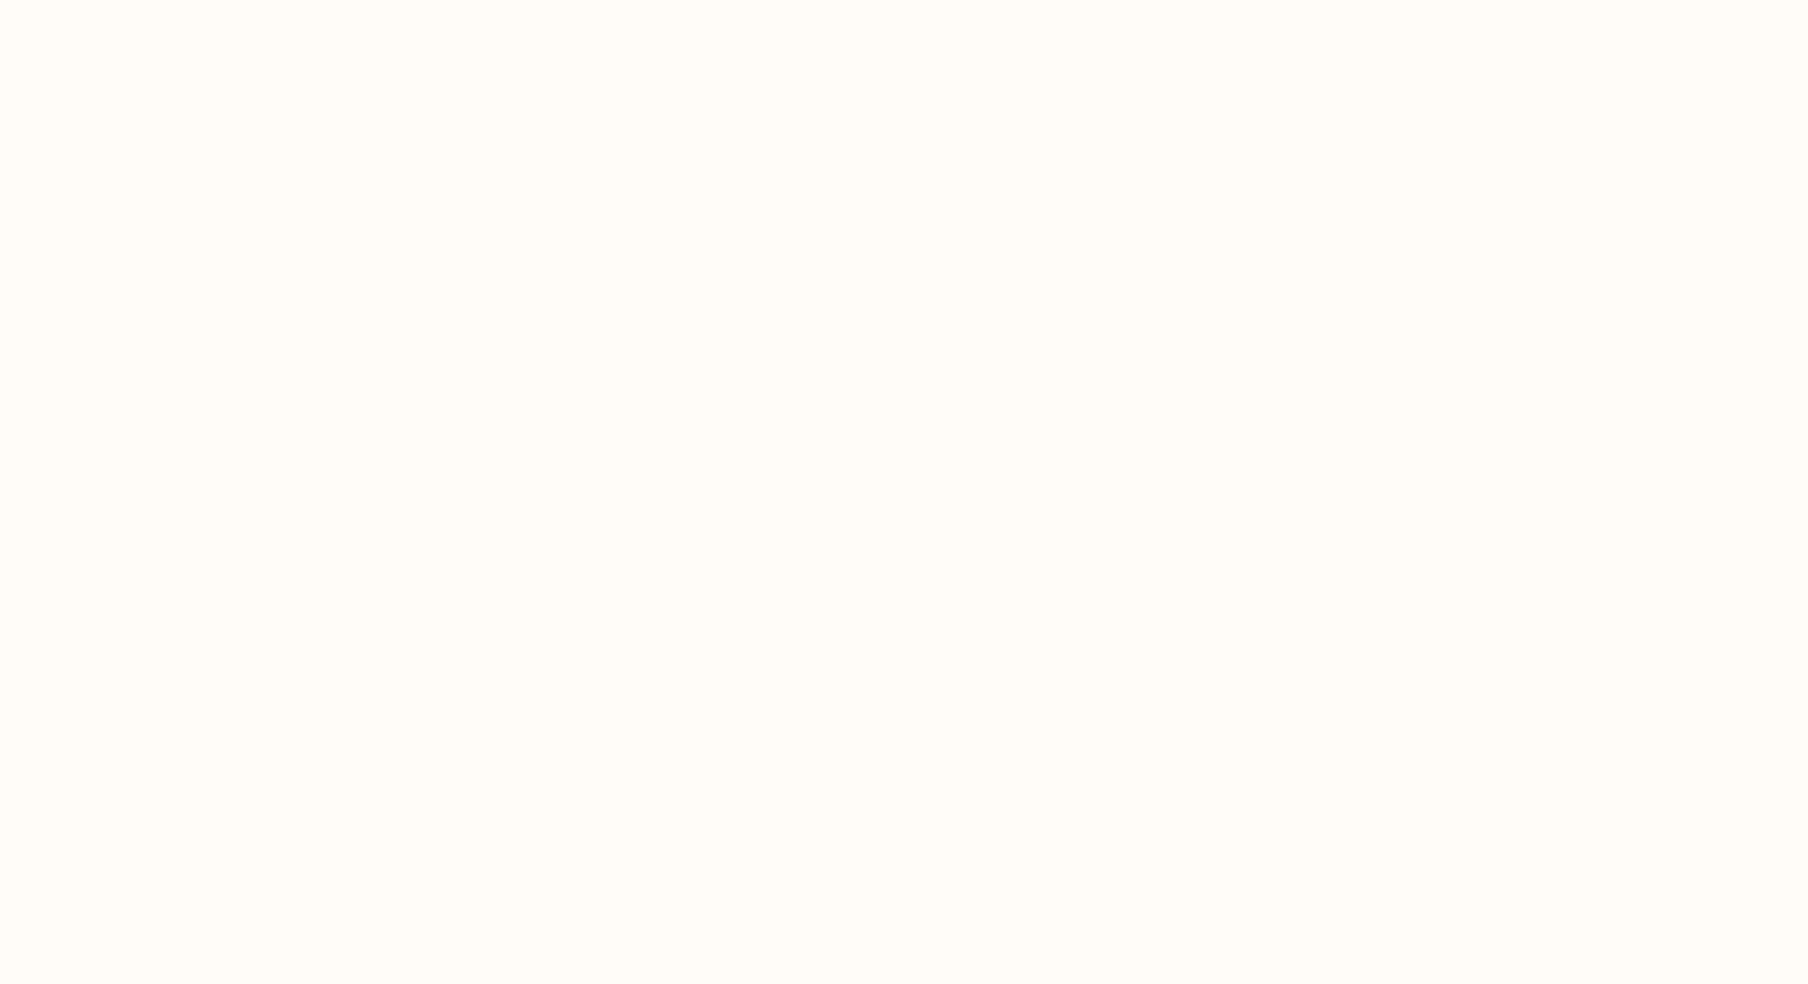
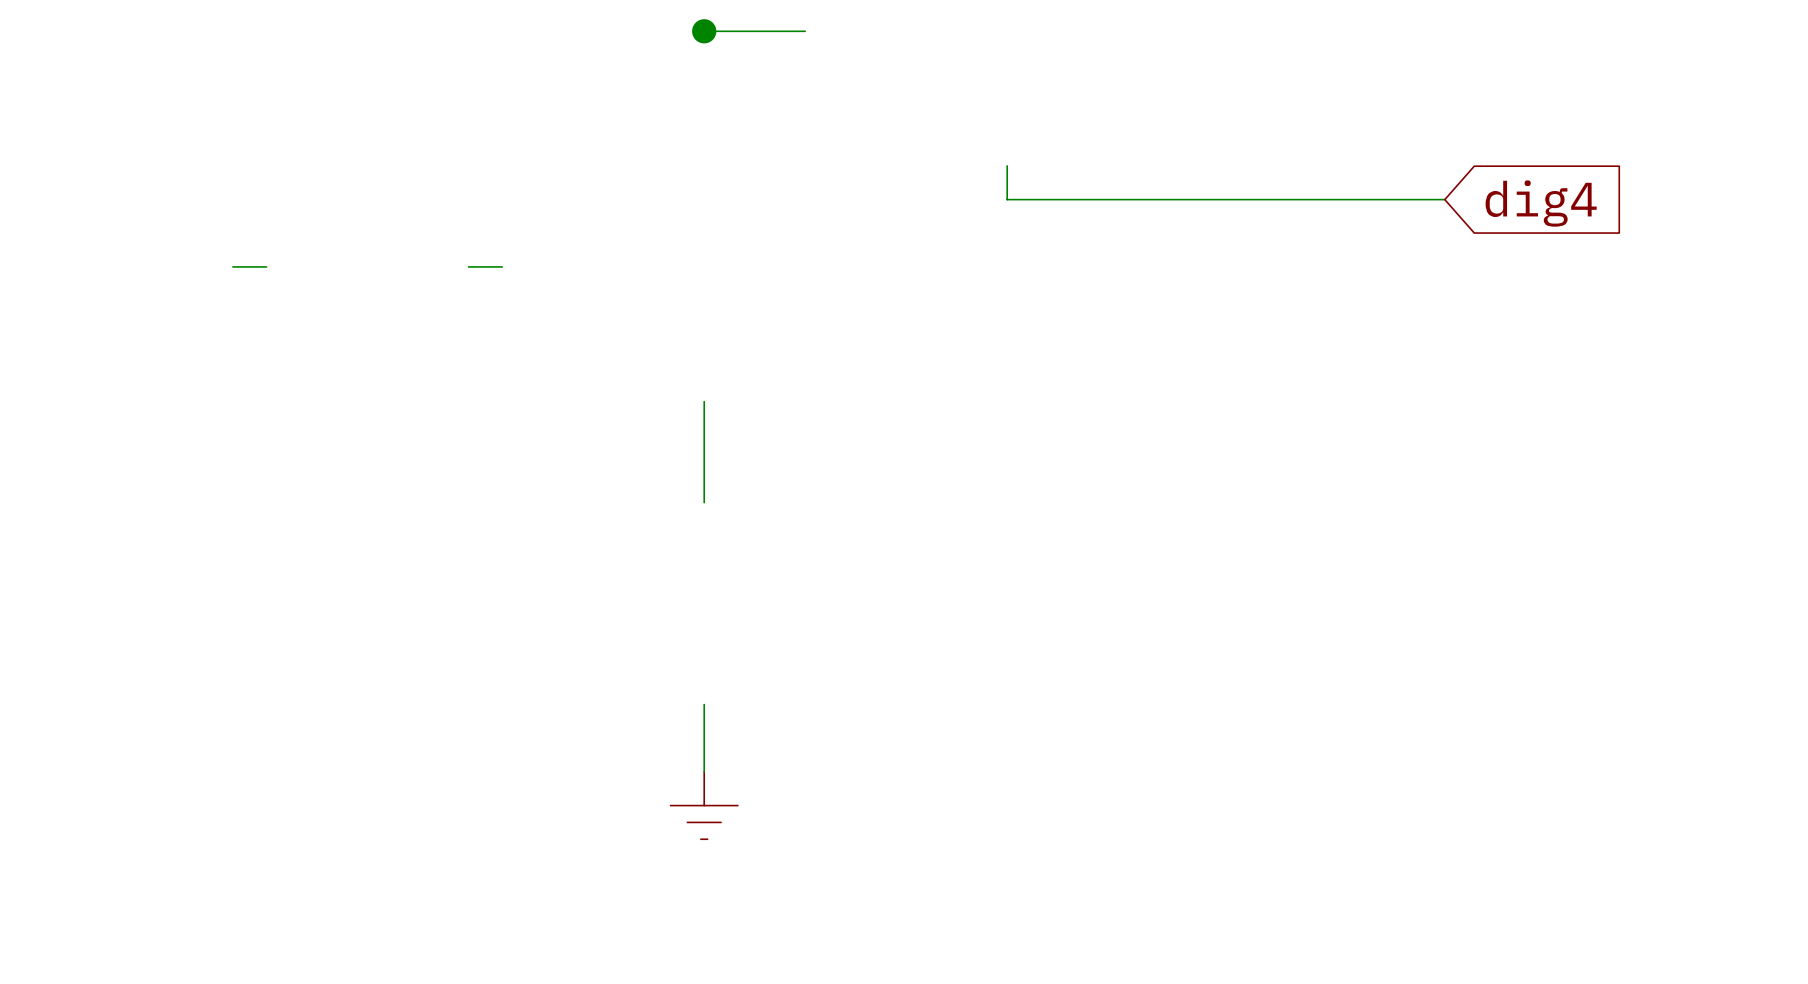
wire: none -> (704, 31) (805, 31)
junction: none -> (704, 31)
wire: none -> (1007, 165) (1007, 199) (1444, 199)
global label: none -> dig4 (1541, 203)
wire: none -> (232, 266) (266, 266)
wire: none -> (468, 266) (502, 266)
wire: none -> (704, 401) (704, 502)
wire: none -> (704, 704) (704, 771)
power symbol: none -> (704, 805)

